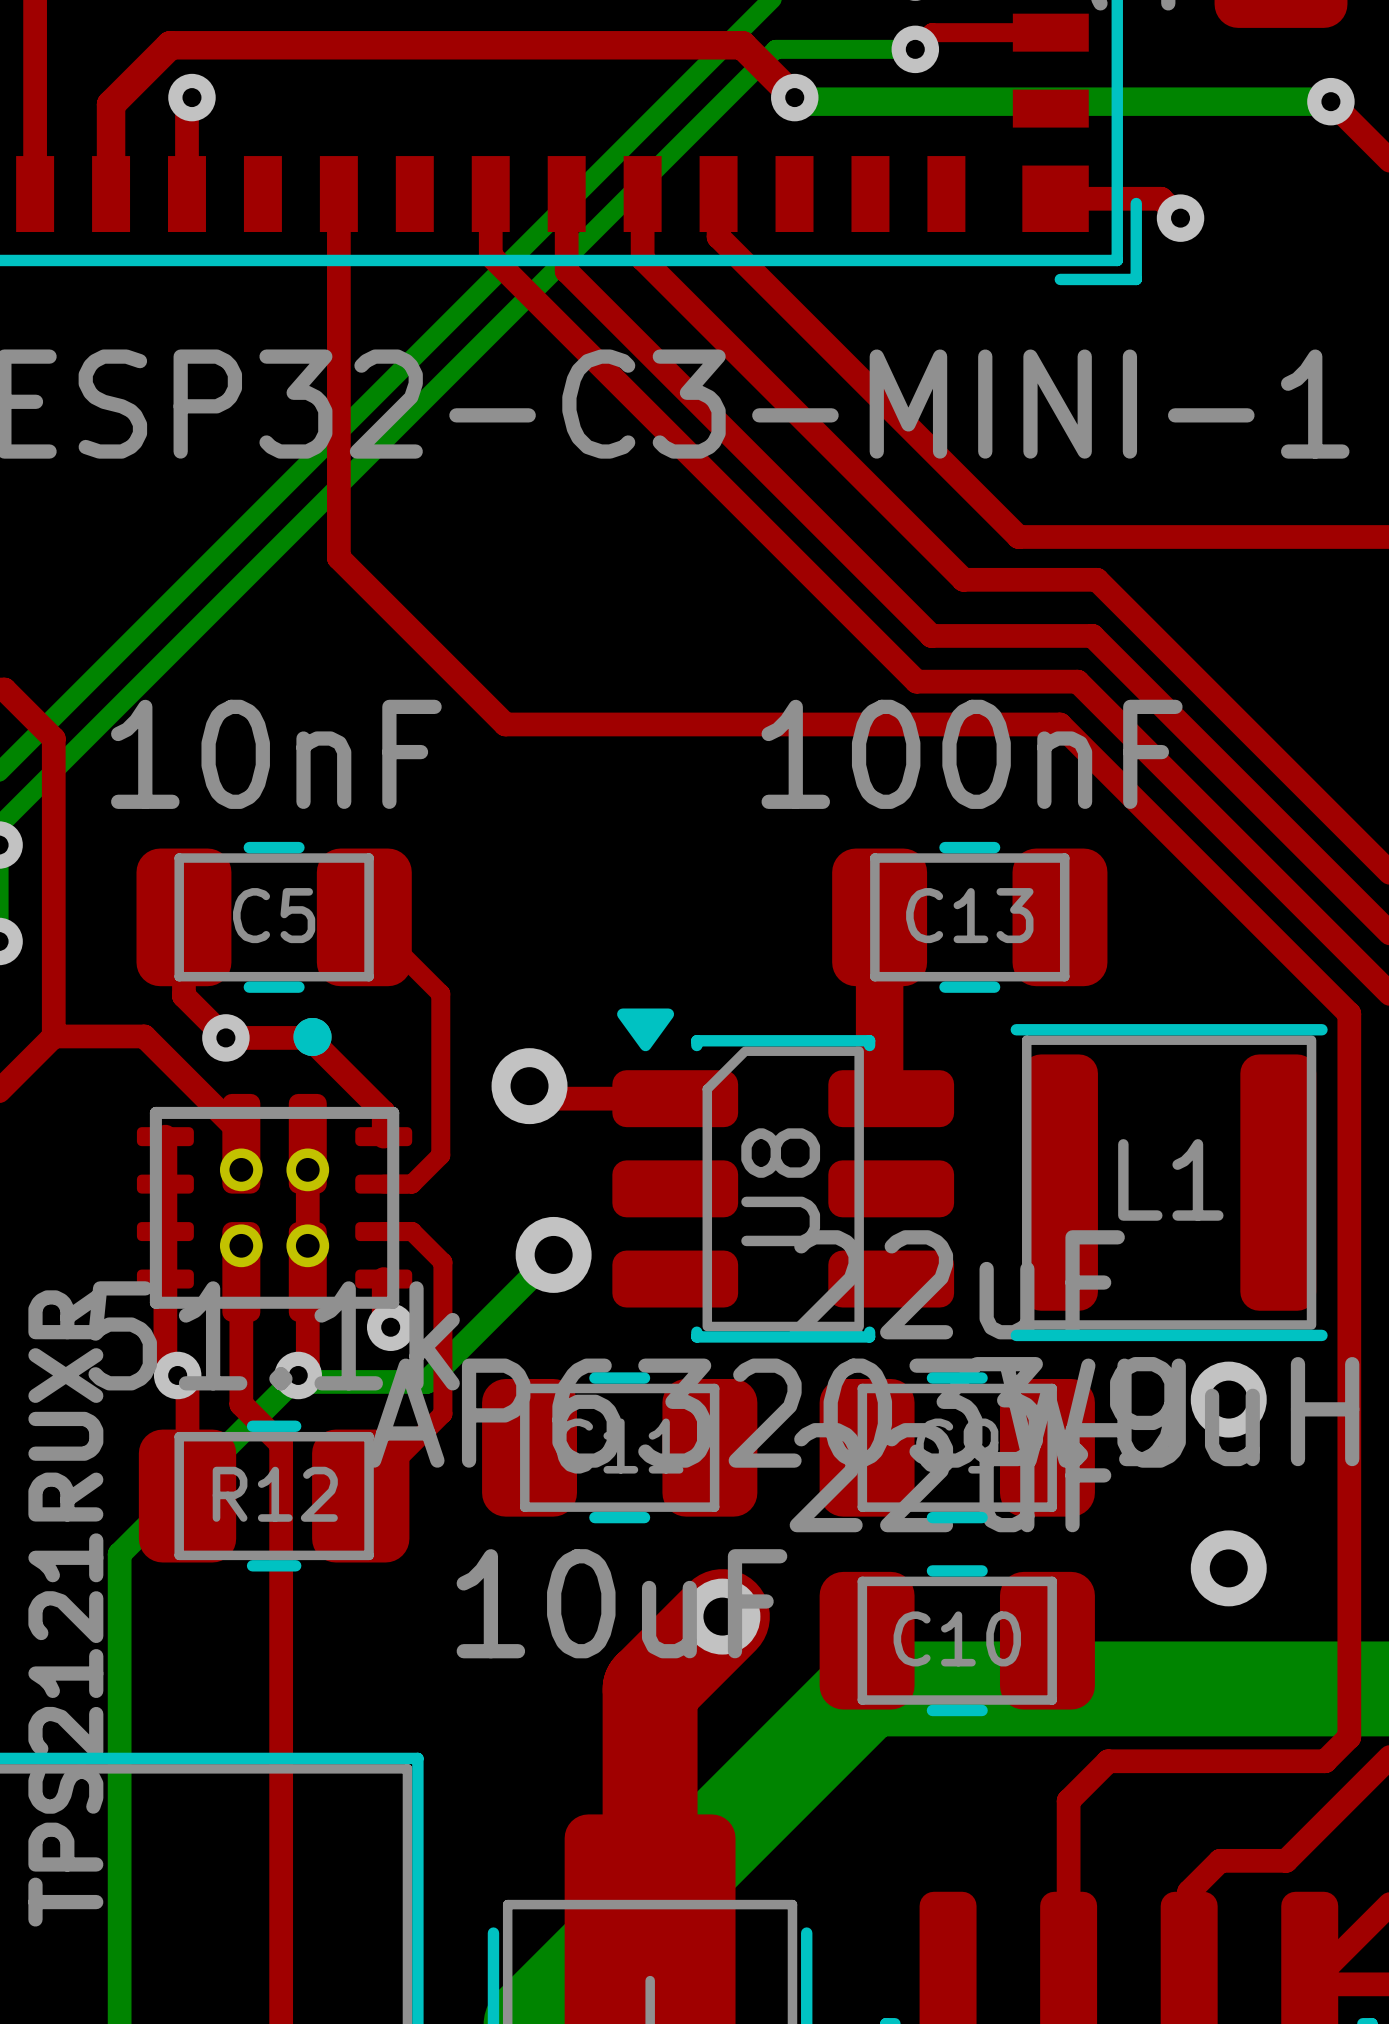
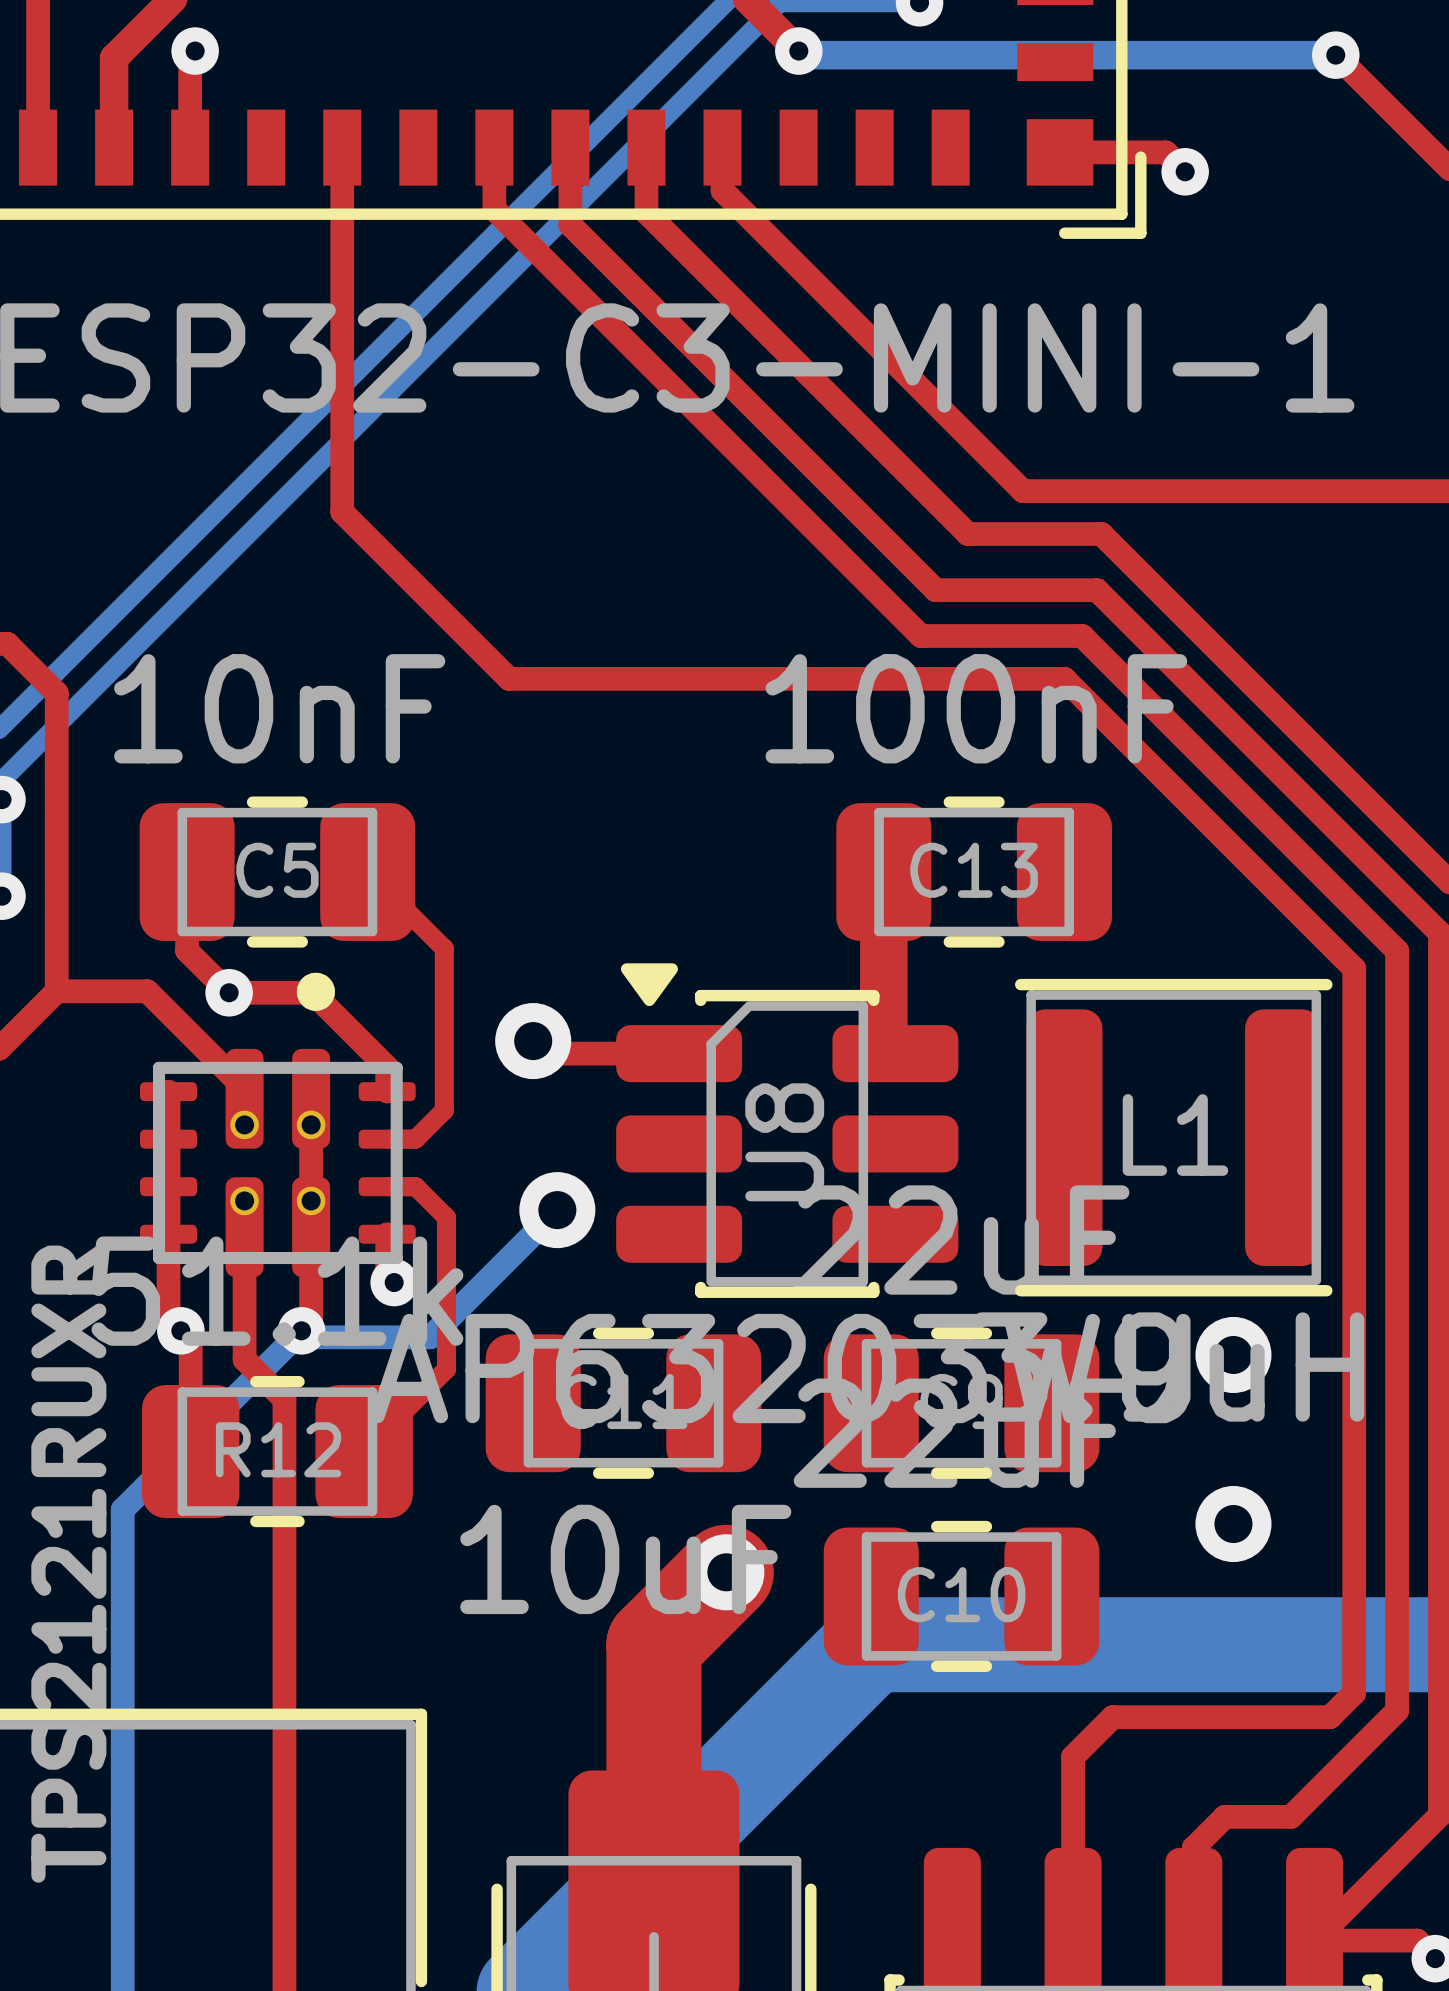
part footprint: [136, 1017, 413, 1322] -> [140, 972, 416, 1278]

